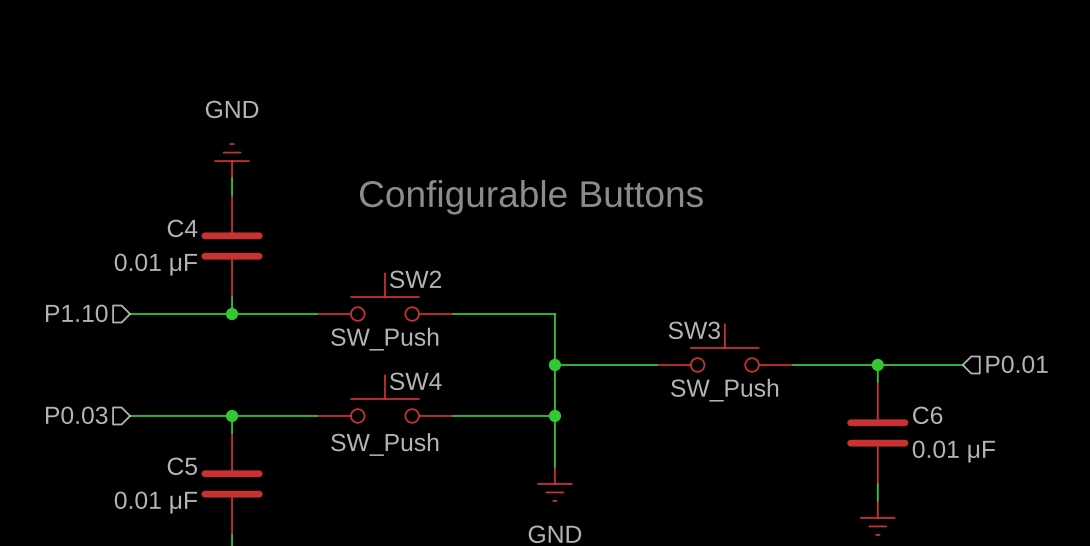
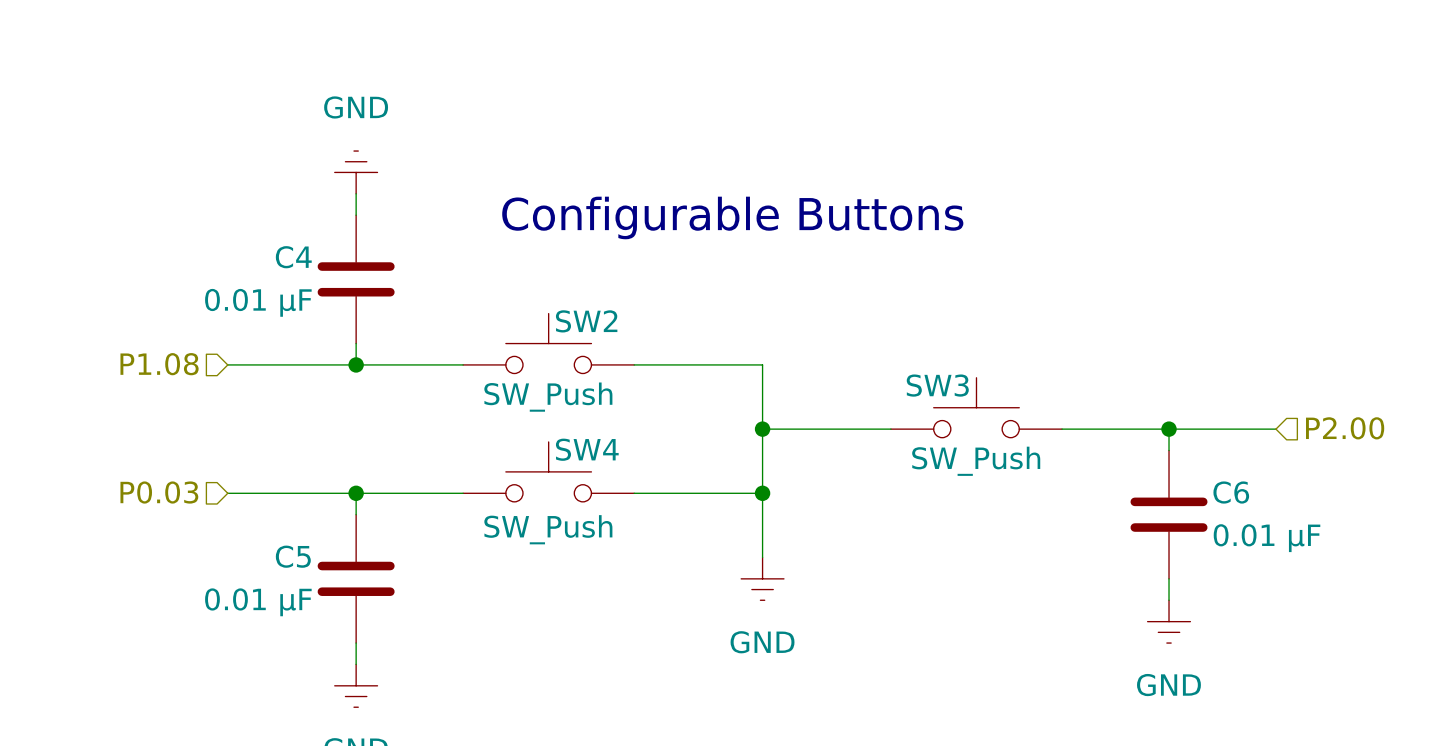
hierarchical label: P1.10 (76, 313) -> P1.08 (159, 364)
hierarchical label: P0.01 (1017, 364) -> P2.00 (1345, 428)

